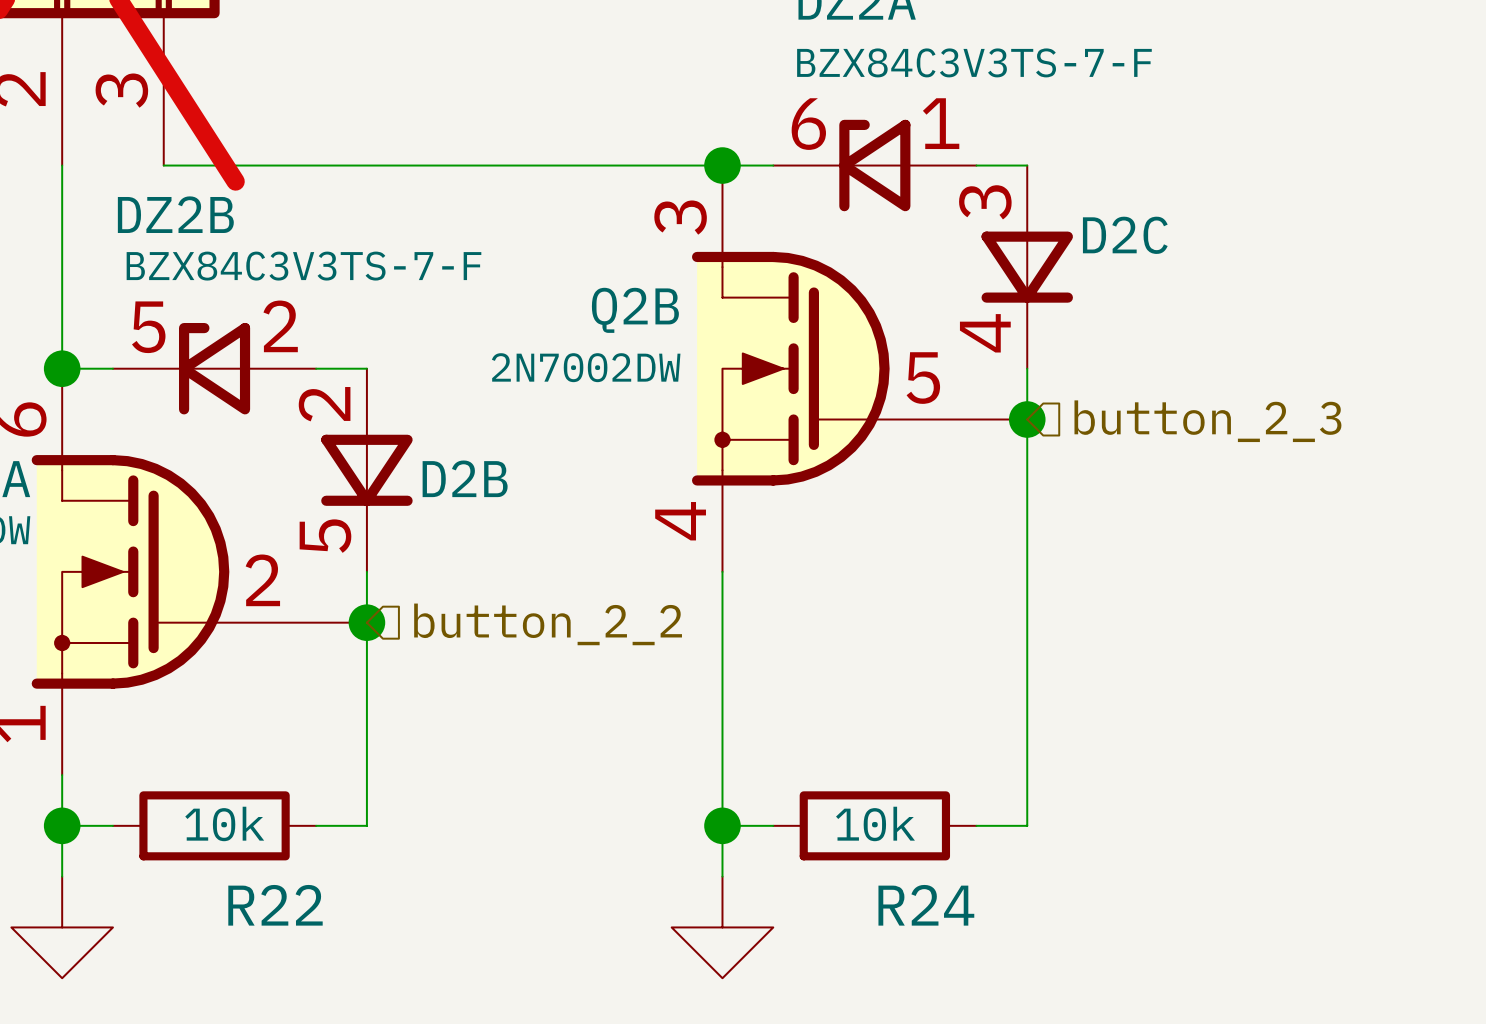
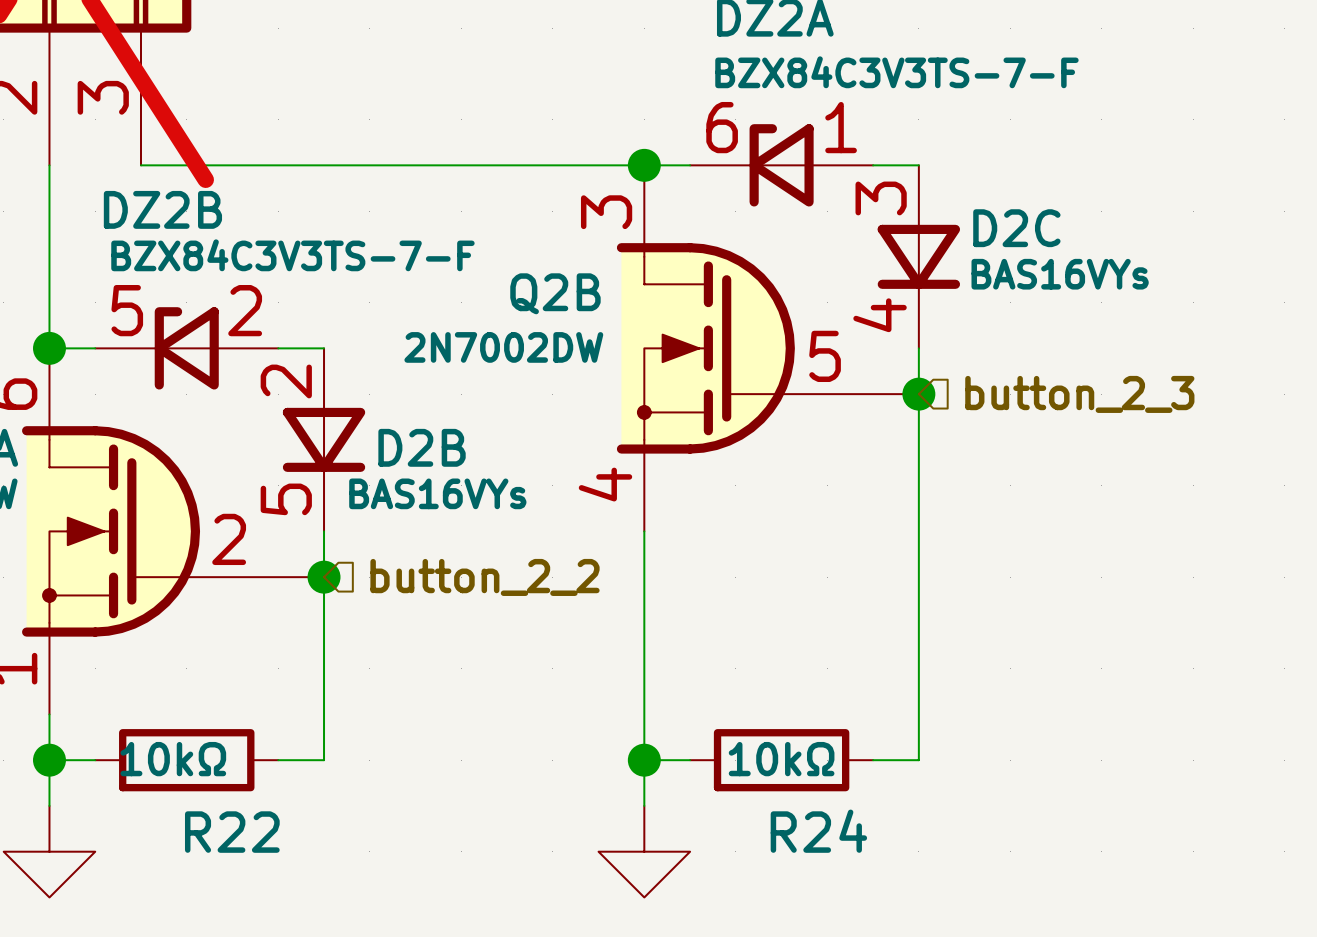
D2C value: none -> BAS16VYs (1060, 274)
D2B value: none -> BAS16VYs (437, 493)
R22 value: 10k (224, 823) -> 10kΩ (173, 759)
R24 value: 10k (875, 823) -> 10kΩ (781, 759)

